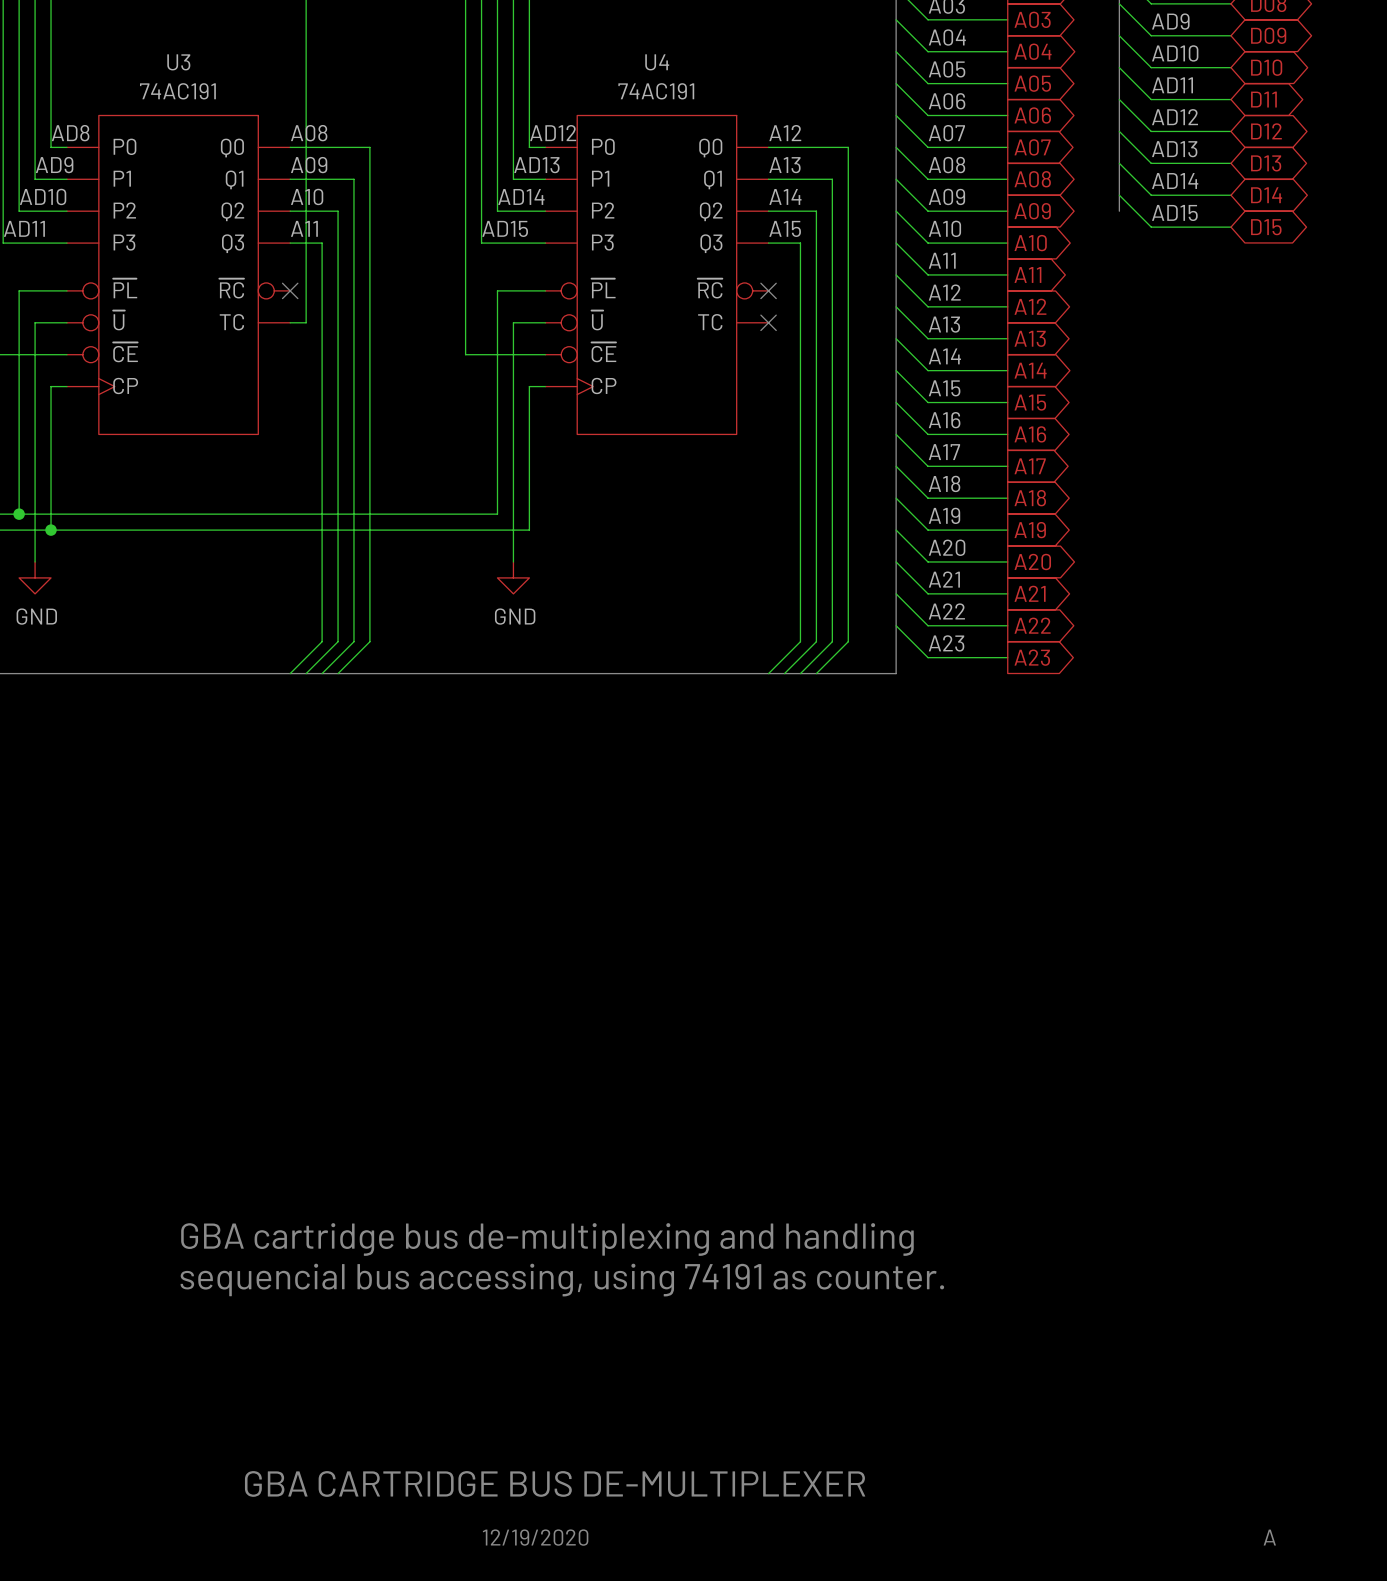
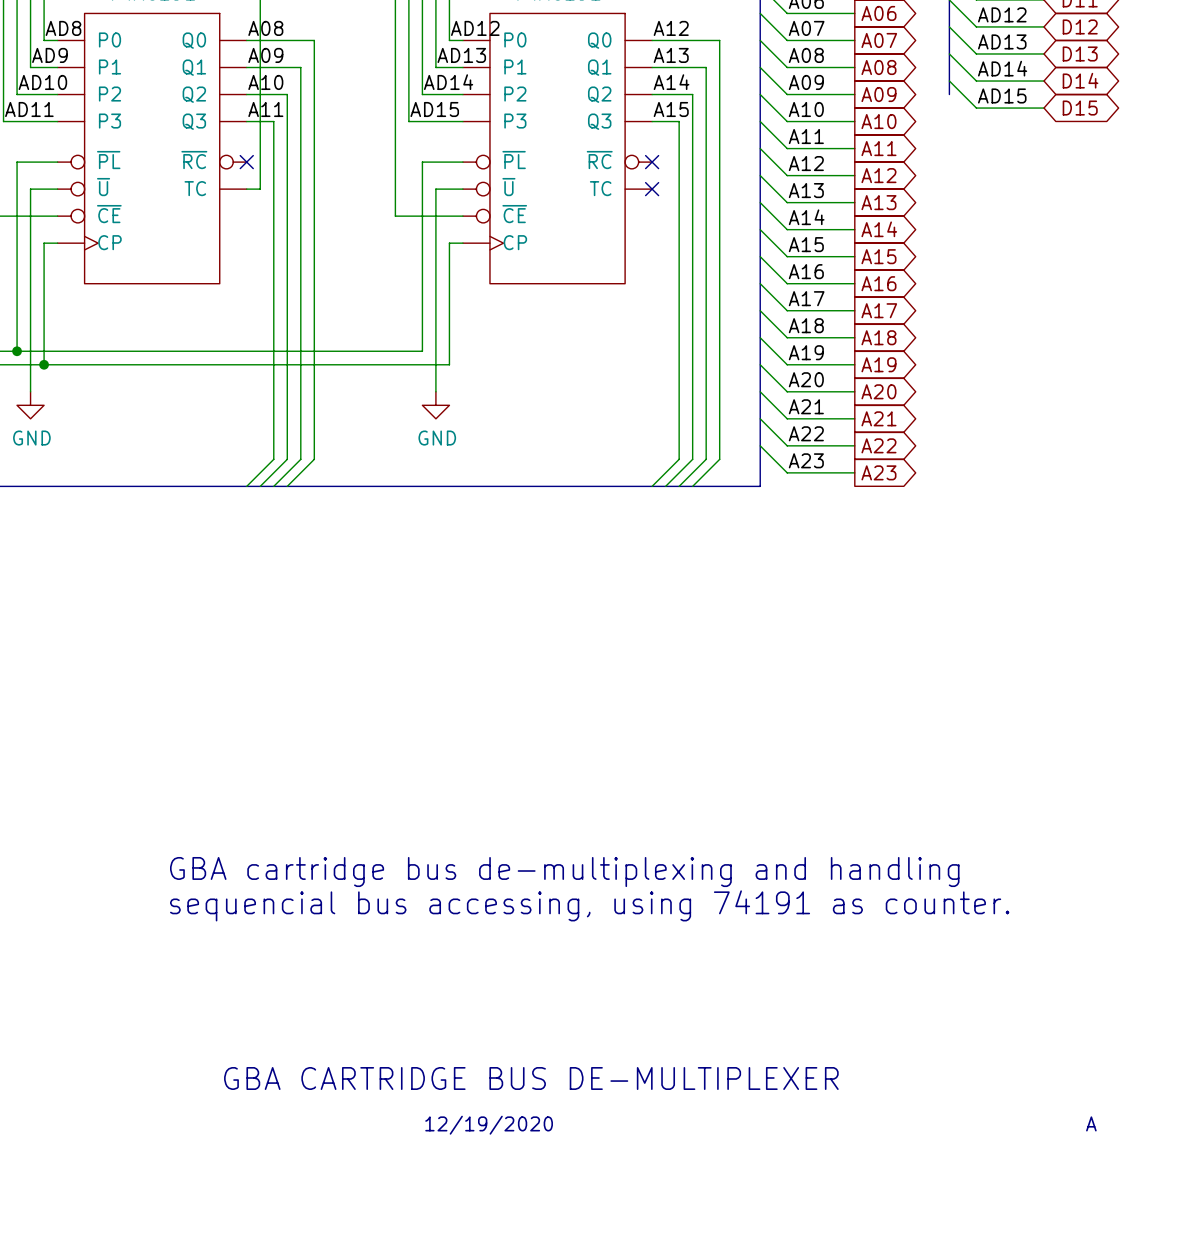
text position: GBA cartridge bus de-multiplexing and handling (547, 1239) -> GBA cartridge bus de-multiplexing and handling (564, 872)
text position: sequencial bus accessing, using 74191 as counter. (562, 1280) -> sequencial bus accessing, using 74191 as counter. (589, 905)
text position: GBA CARTRIDGE BUS DE-MULTIPLEXER (555, 1483) -> GBA CARTRIDGE BUS DE-MULTIPLEXER (531, 1078)
text position: 12/19/2020 (535, 1537) -> 12/19/2020 (489, 1125)
text position: A (1269, 1537) -> A (1091, 1123)

